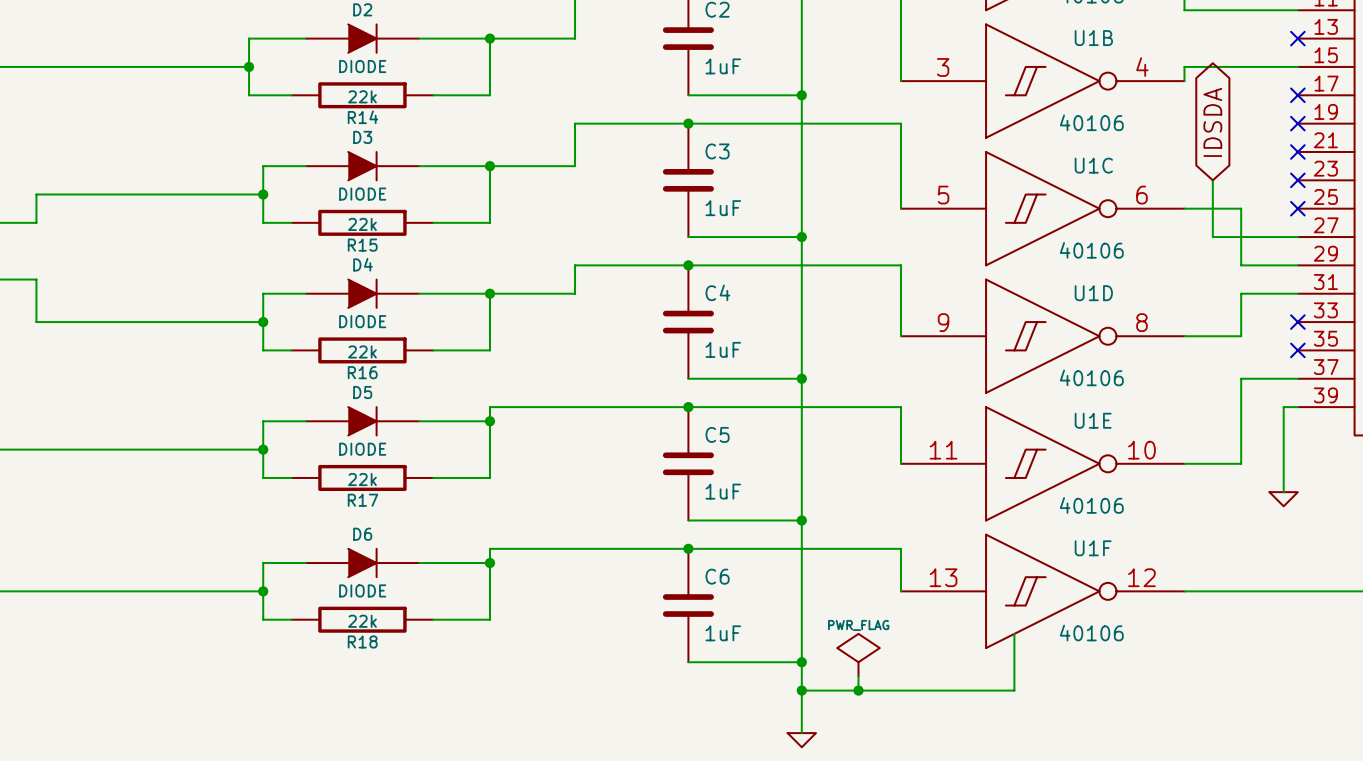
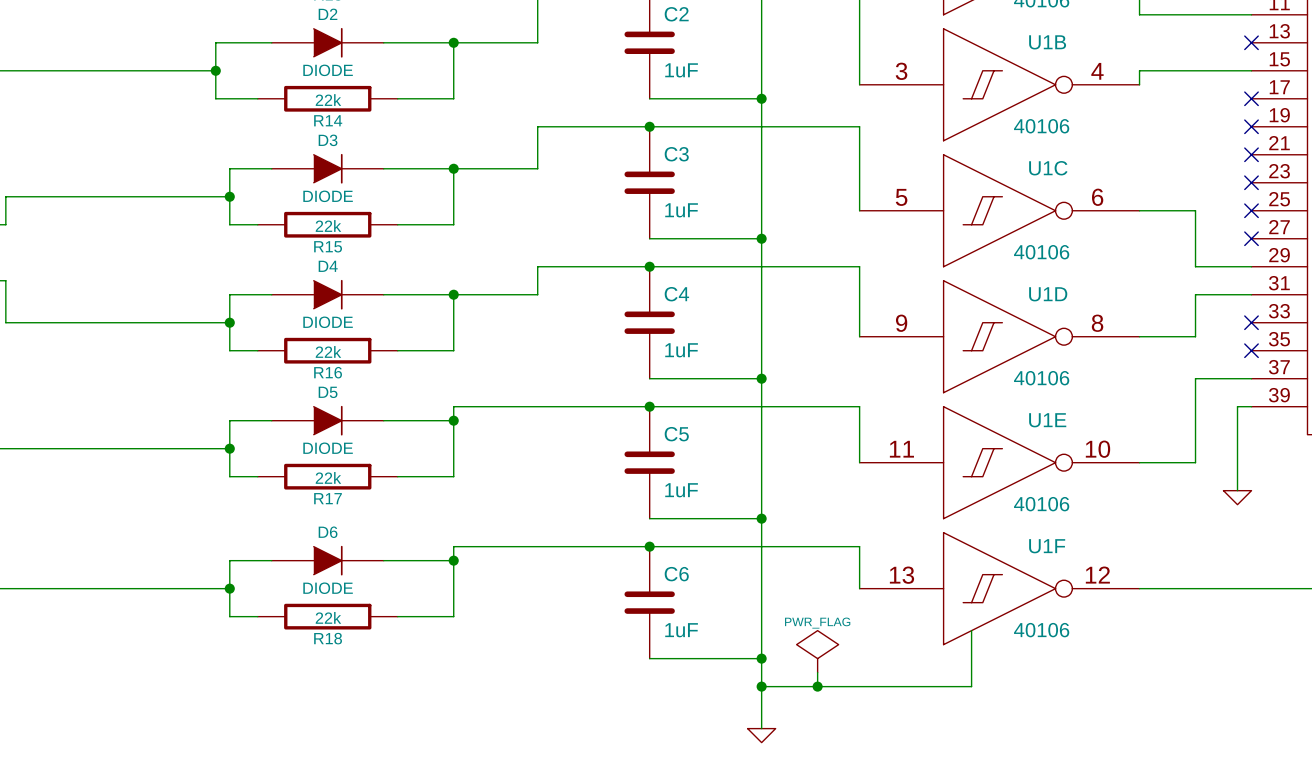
global label: IDSDA (1212, 122) -> none
wire: (1212, 180) (1212, 237) (1297, 237) -> none
no-connect mark: none -> (1251, 238)

